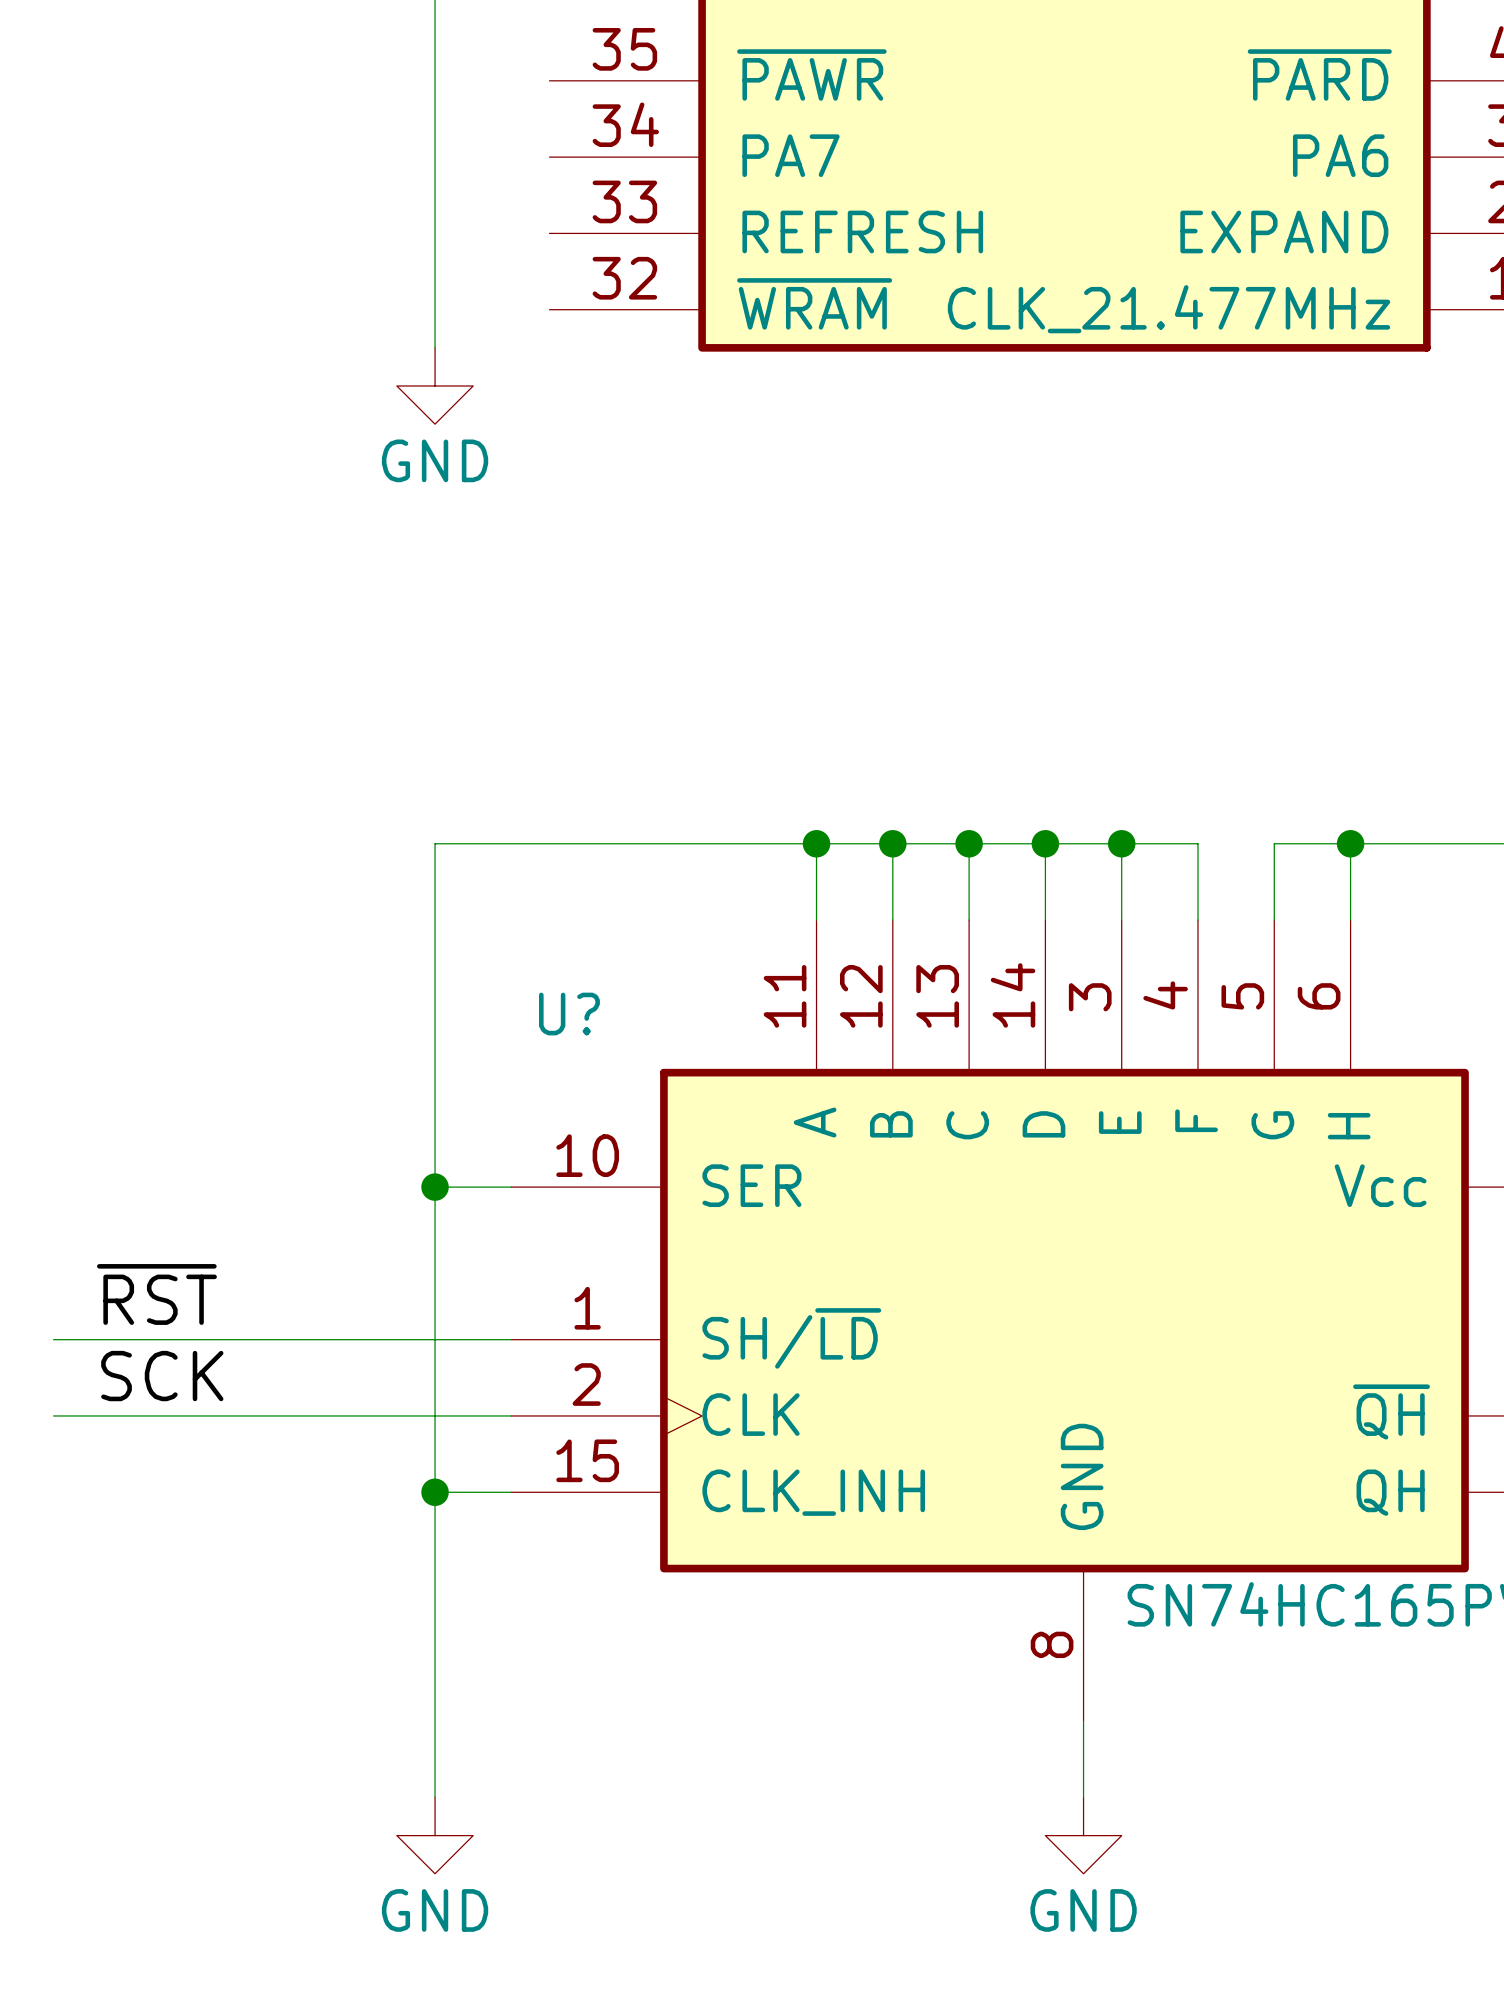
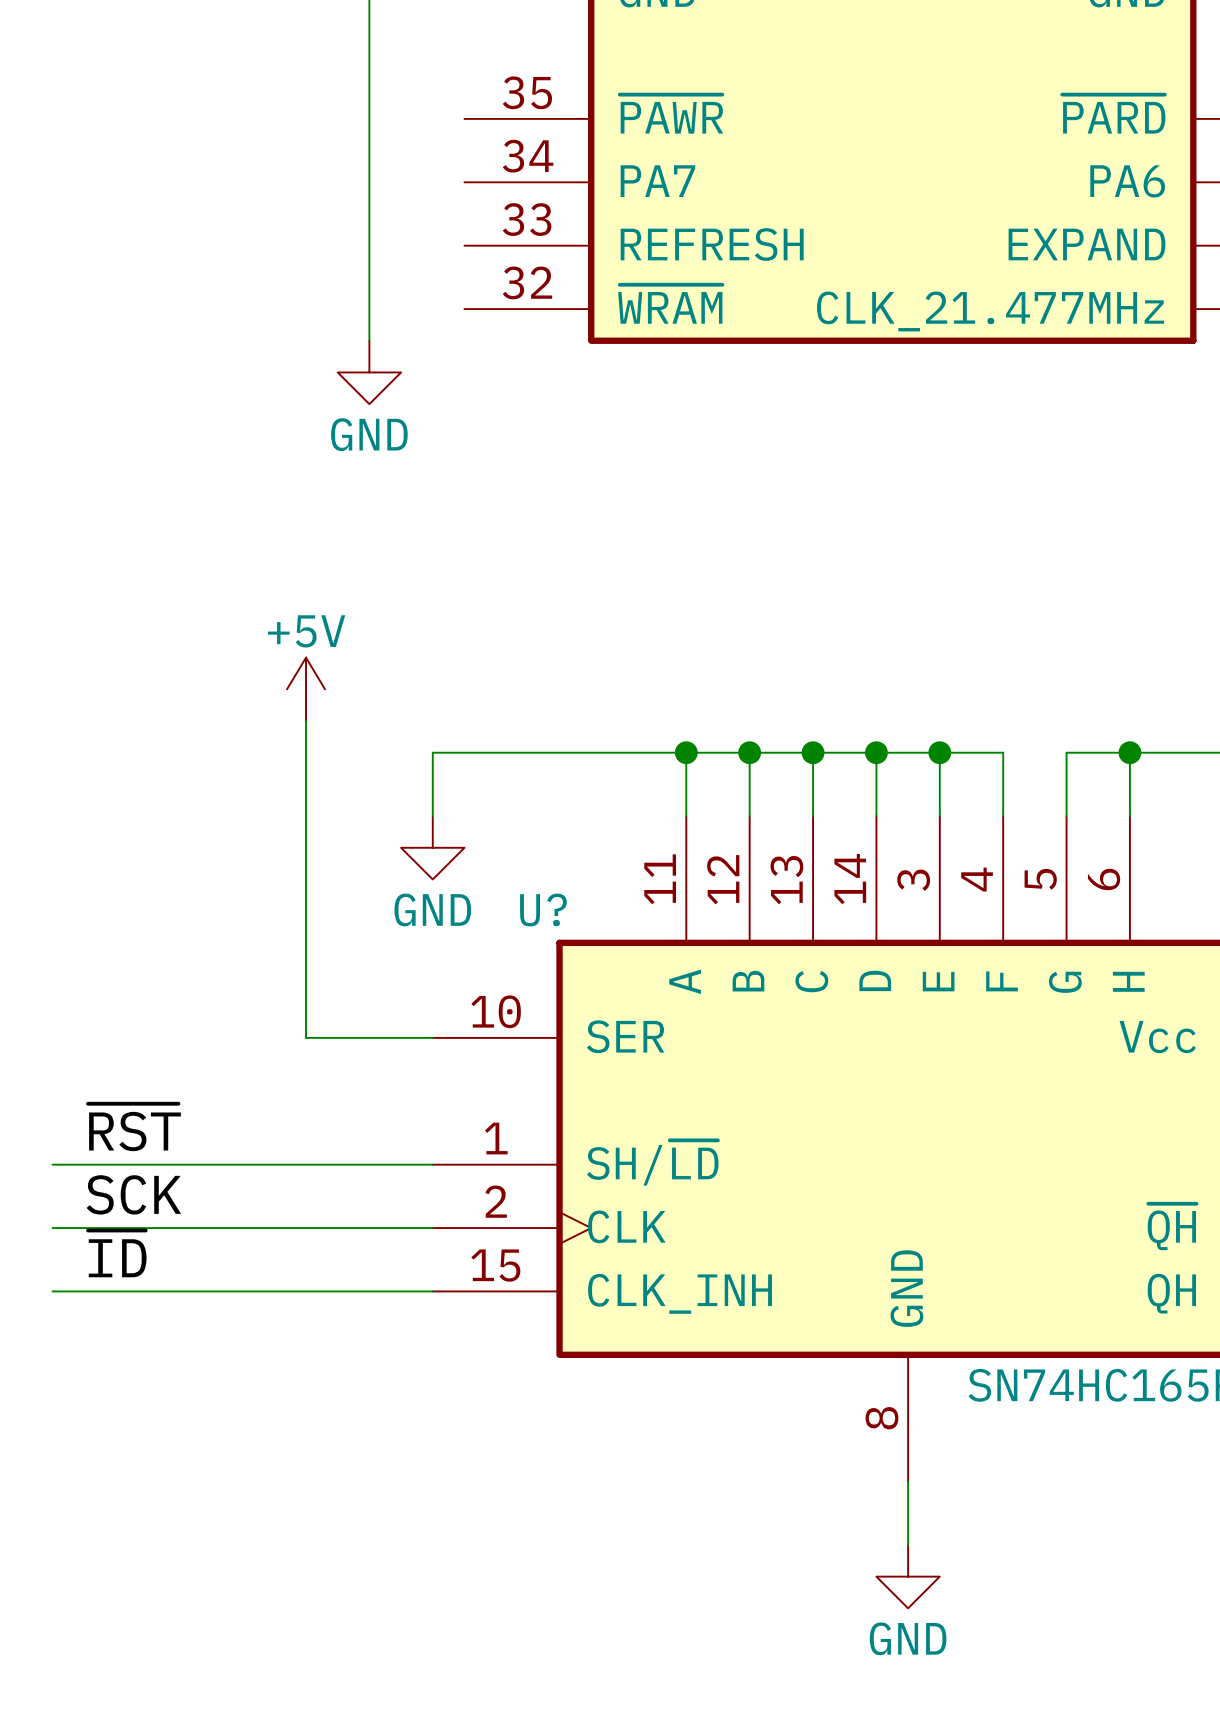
power symbol: none -> +5V (306, 689)
wire: none -> (306, 721) (306, 1037) (369, 1037)
wire: (511, 843) (435, 843) (435, 1797) -> (432, 752) (432, 816)
power symbol: none -> GND (432, 847)
U? name position: U? (569, 1014) -> U? (543, 909)
junction: (435, 1187) -> none
label: none -> ~{ID} (117, 1253)
wire: none -> (52, 1291) (369, 1291)
junction: (435, 1492) -> none
power symbol: GND (435, 1835) -> none

